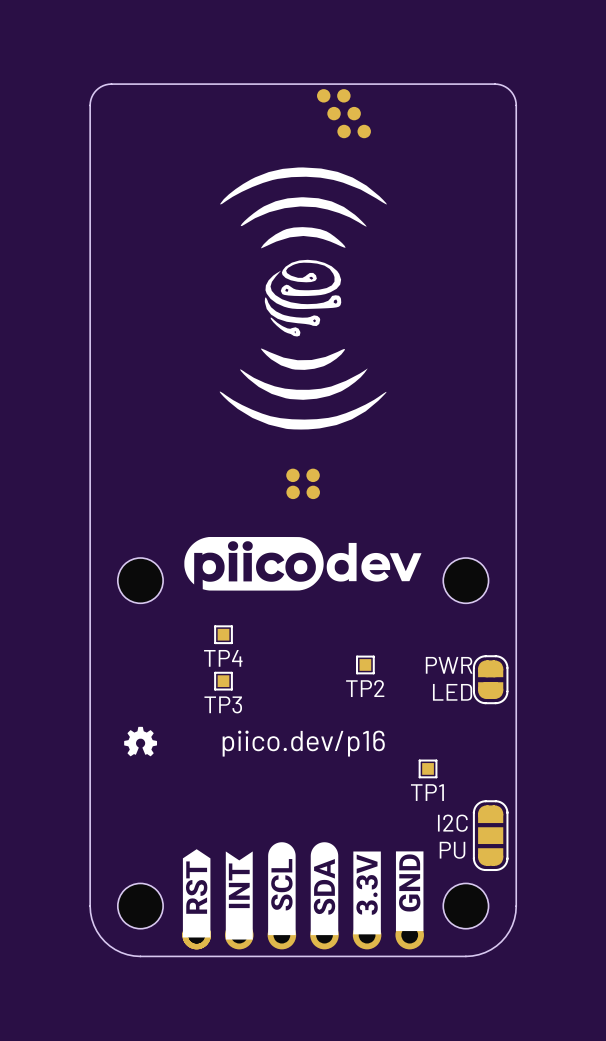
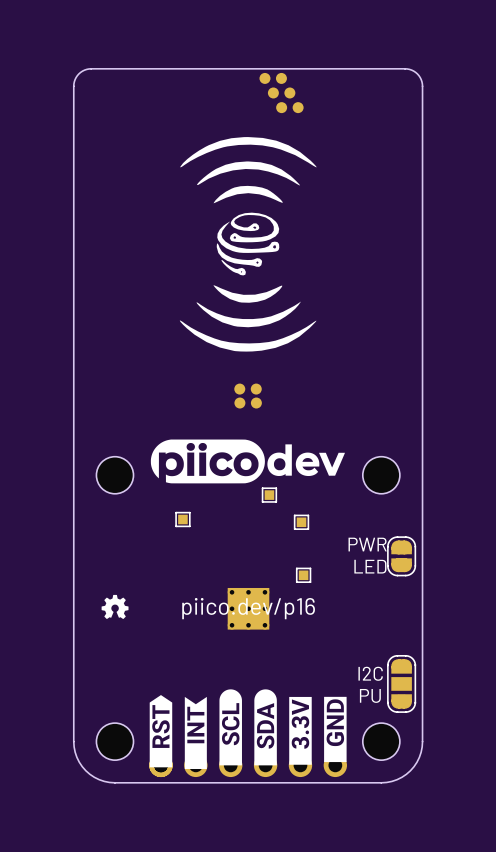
part: none -> (269, 495)
part: none -> (301, 522)
TP4 name: TP4 (223, 658) -> none
TP2: (365, 664) -> none
TP3: (223, 681) -> none
part: none -> (303, 575)
part: none -> (248, 608)
TP1: (428, 768) -> none

